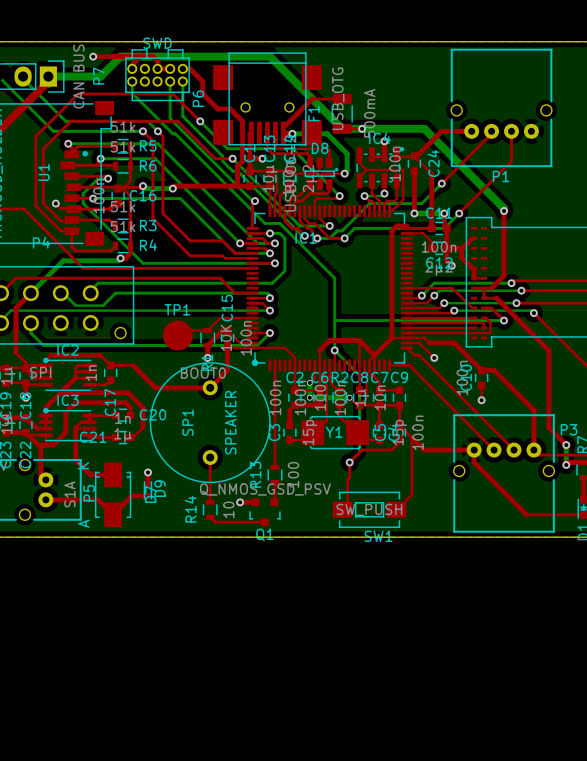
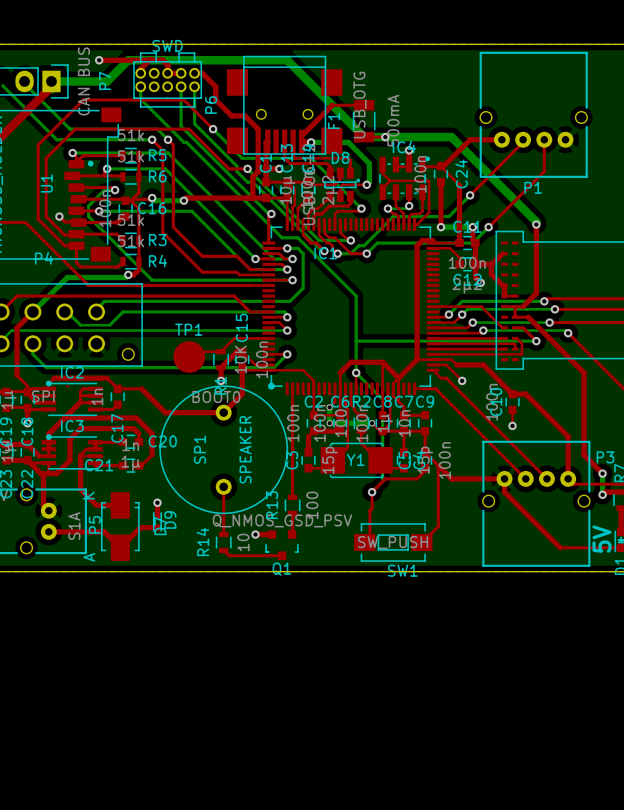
text: none -> 5V (602, 539)

